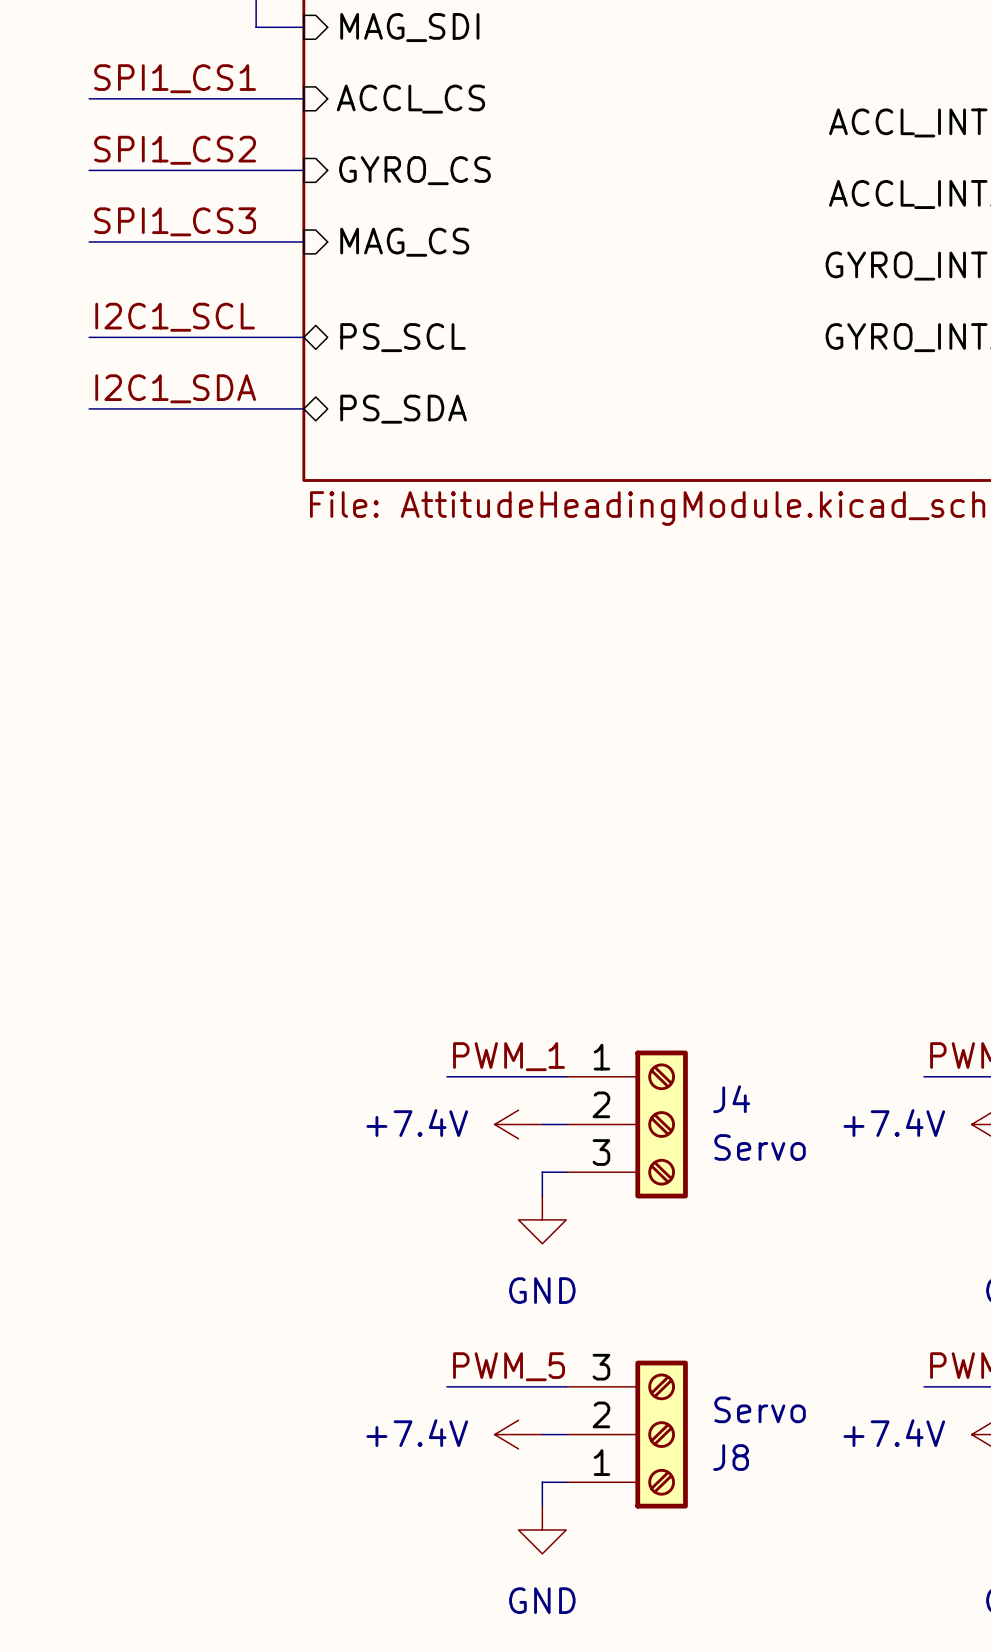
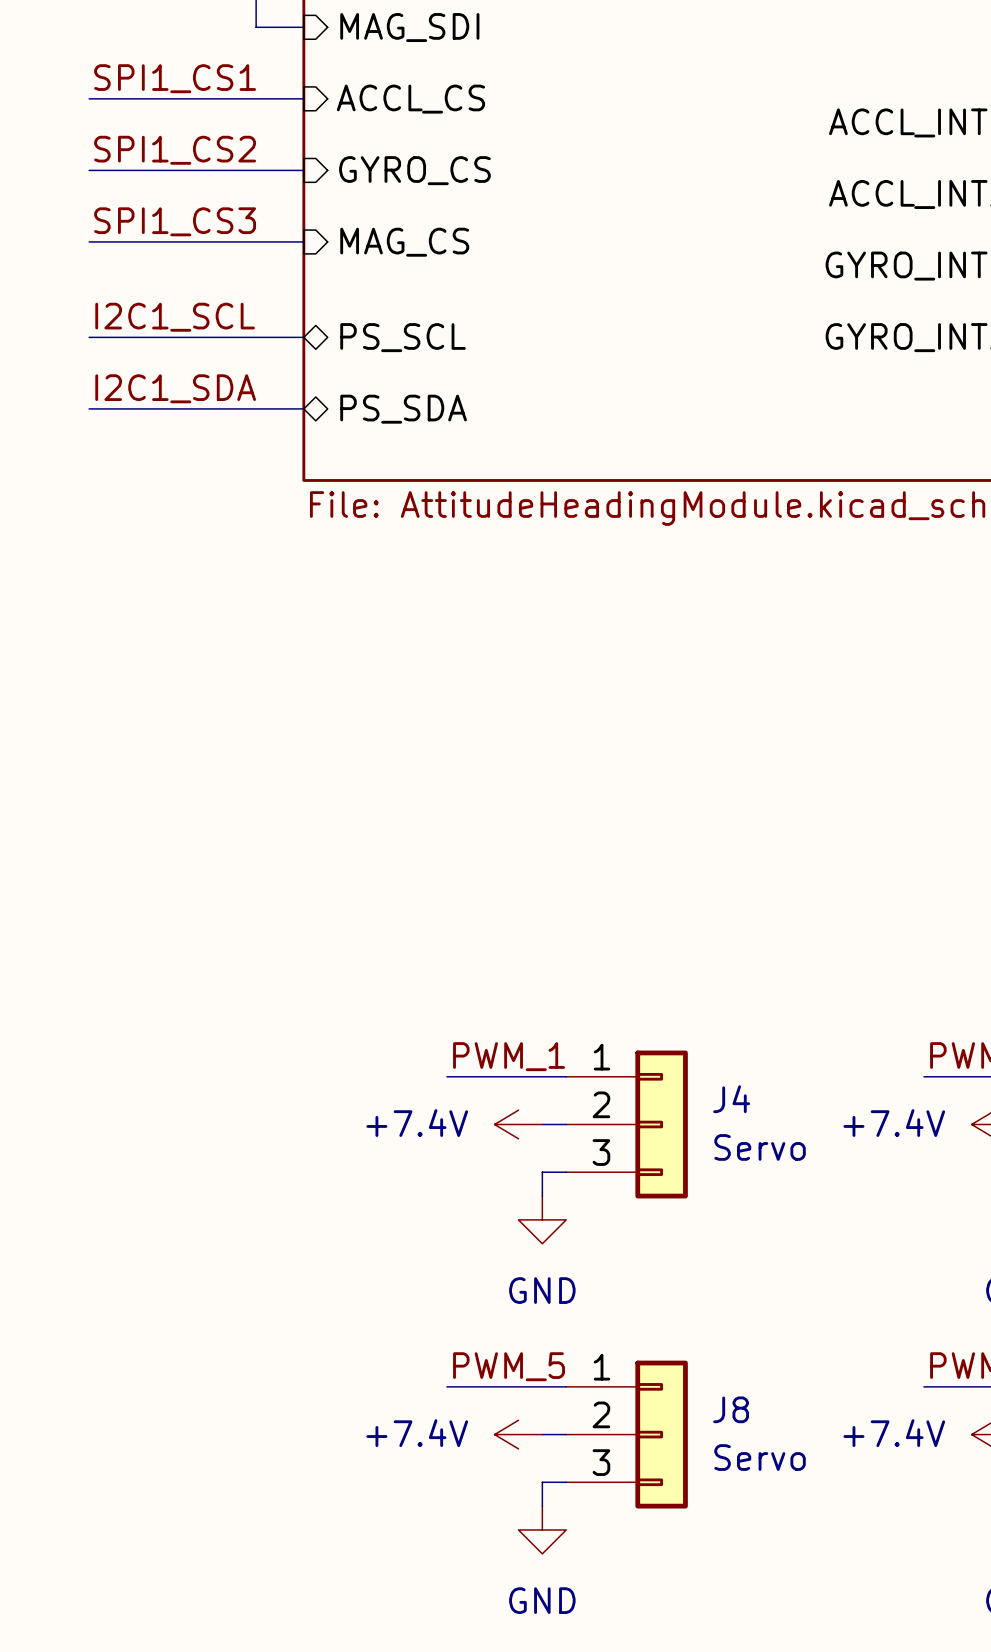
J4 symbol: [566, 1050, 688, 1199] -> [566, 1050, 688, 1199]
J8 symbol: [566, 1360, 688, 1509] -> [566, 1360, 688, 1509]
J8 value position: Servo (760, 1409) -> Servo (760, 1457)
J8 name position: J8 (731, 1457) -> J8 (731, 1409)

